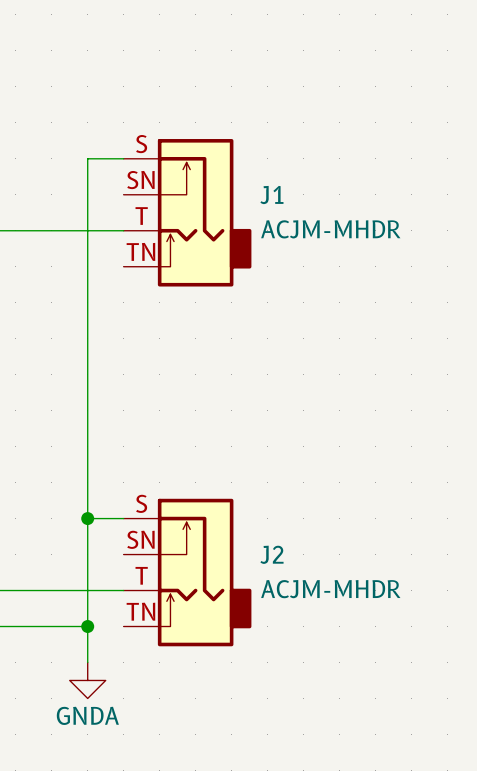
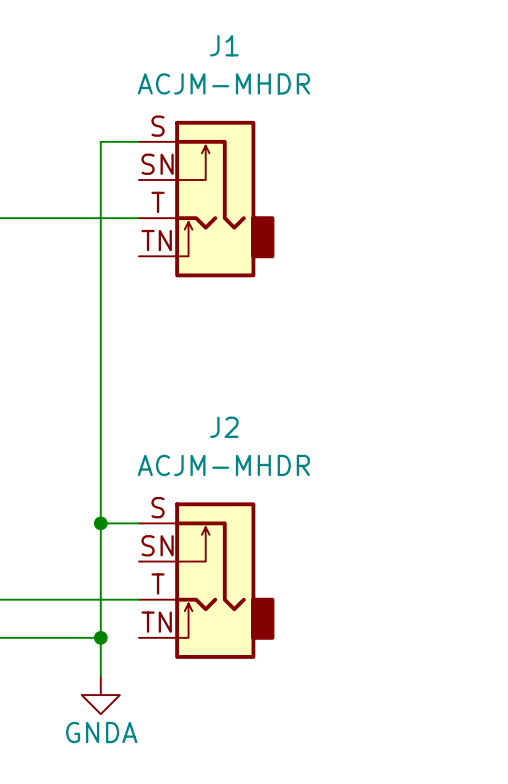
J1 name position: J1 (271, 195) -> J1 (224, 45)
J1 text position: ACJM-MHDR (330, 229) -> ACJM-MHDR (223, 83)
J2 name position: J2 (271, 554) -> J2 (224, 427)
J2 text position: ACJM-MHDR (330, 589) -> ACJM-MHDR (223, 465)

